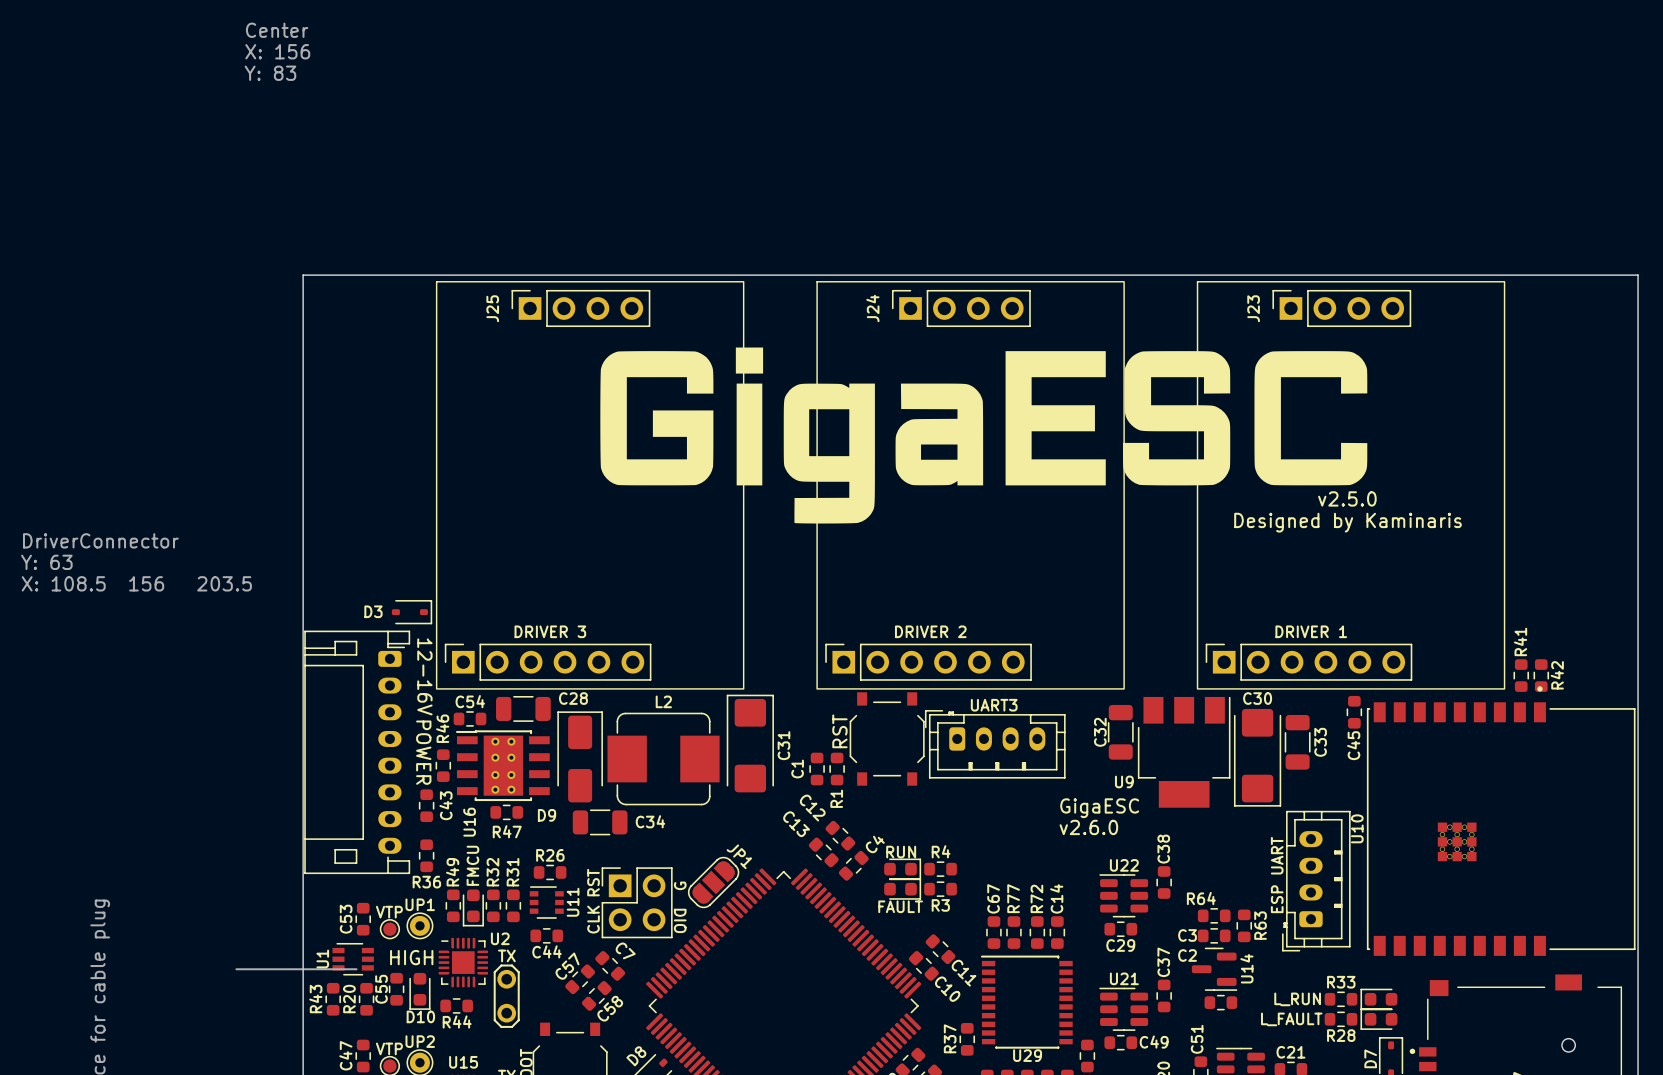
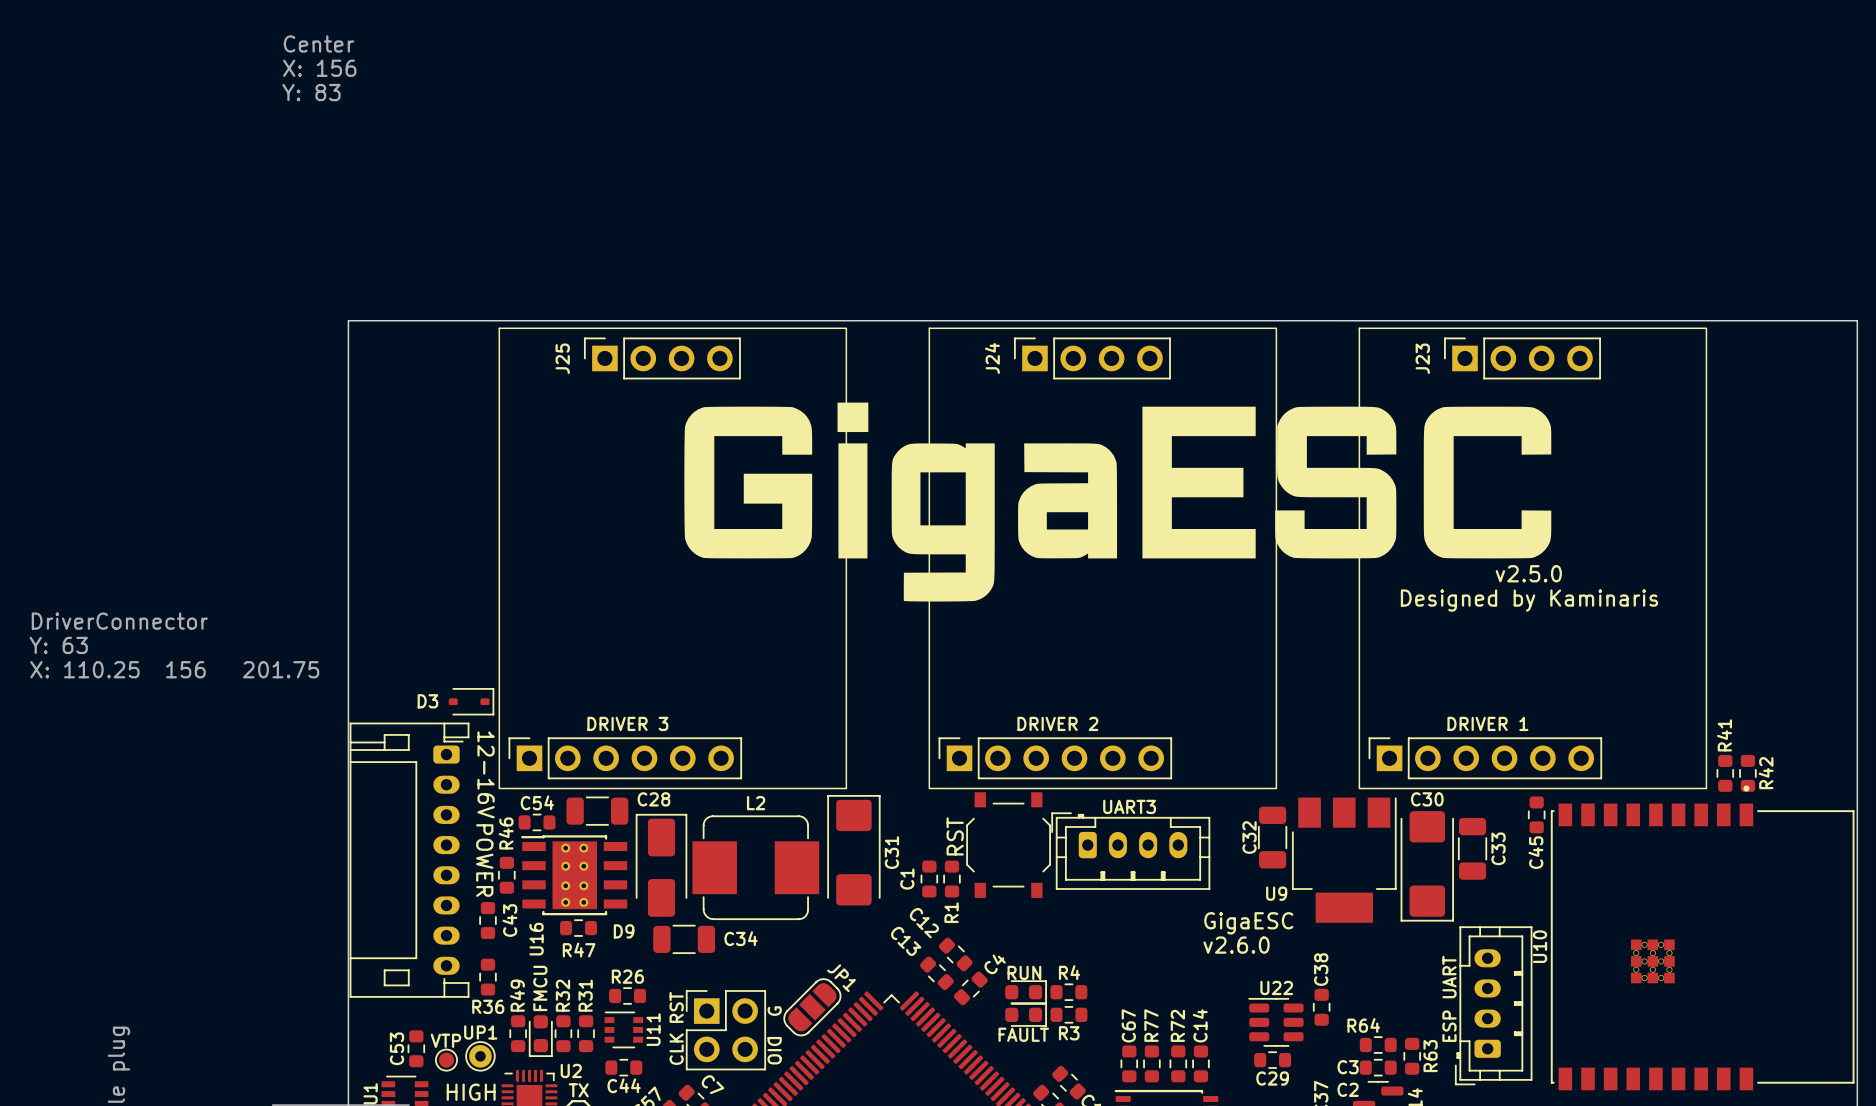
text: X: 108.5 156 203.5 (136, 583) -> X: 110.25 156 201.75 (174, 669)

